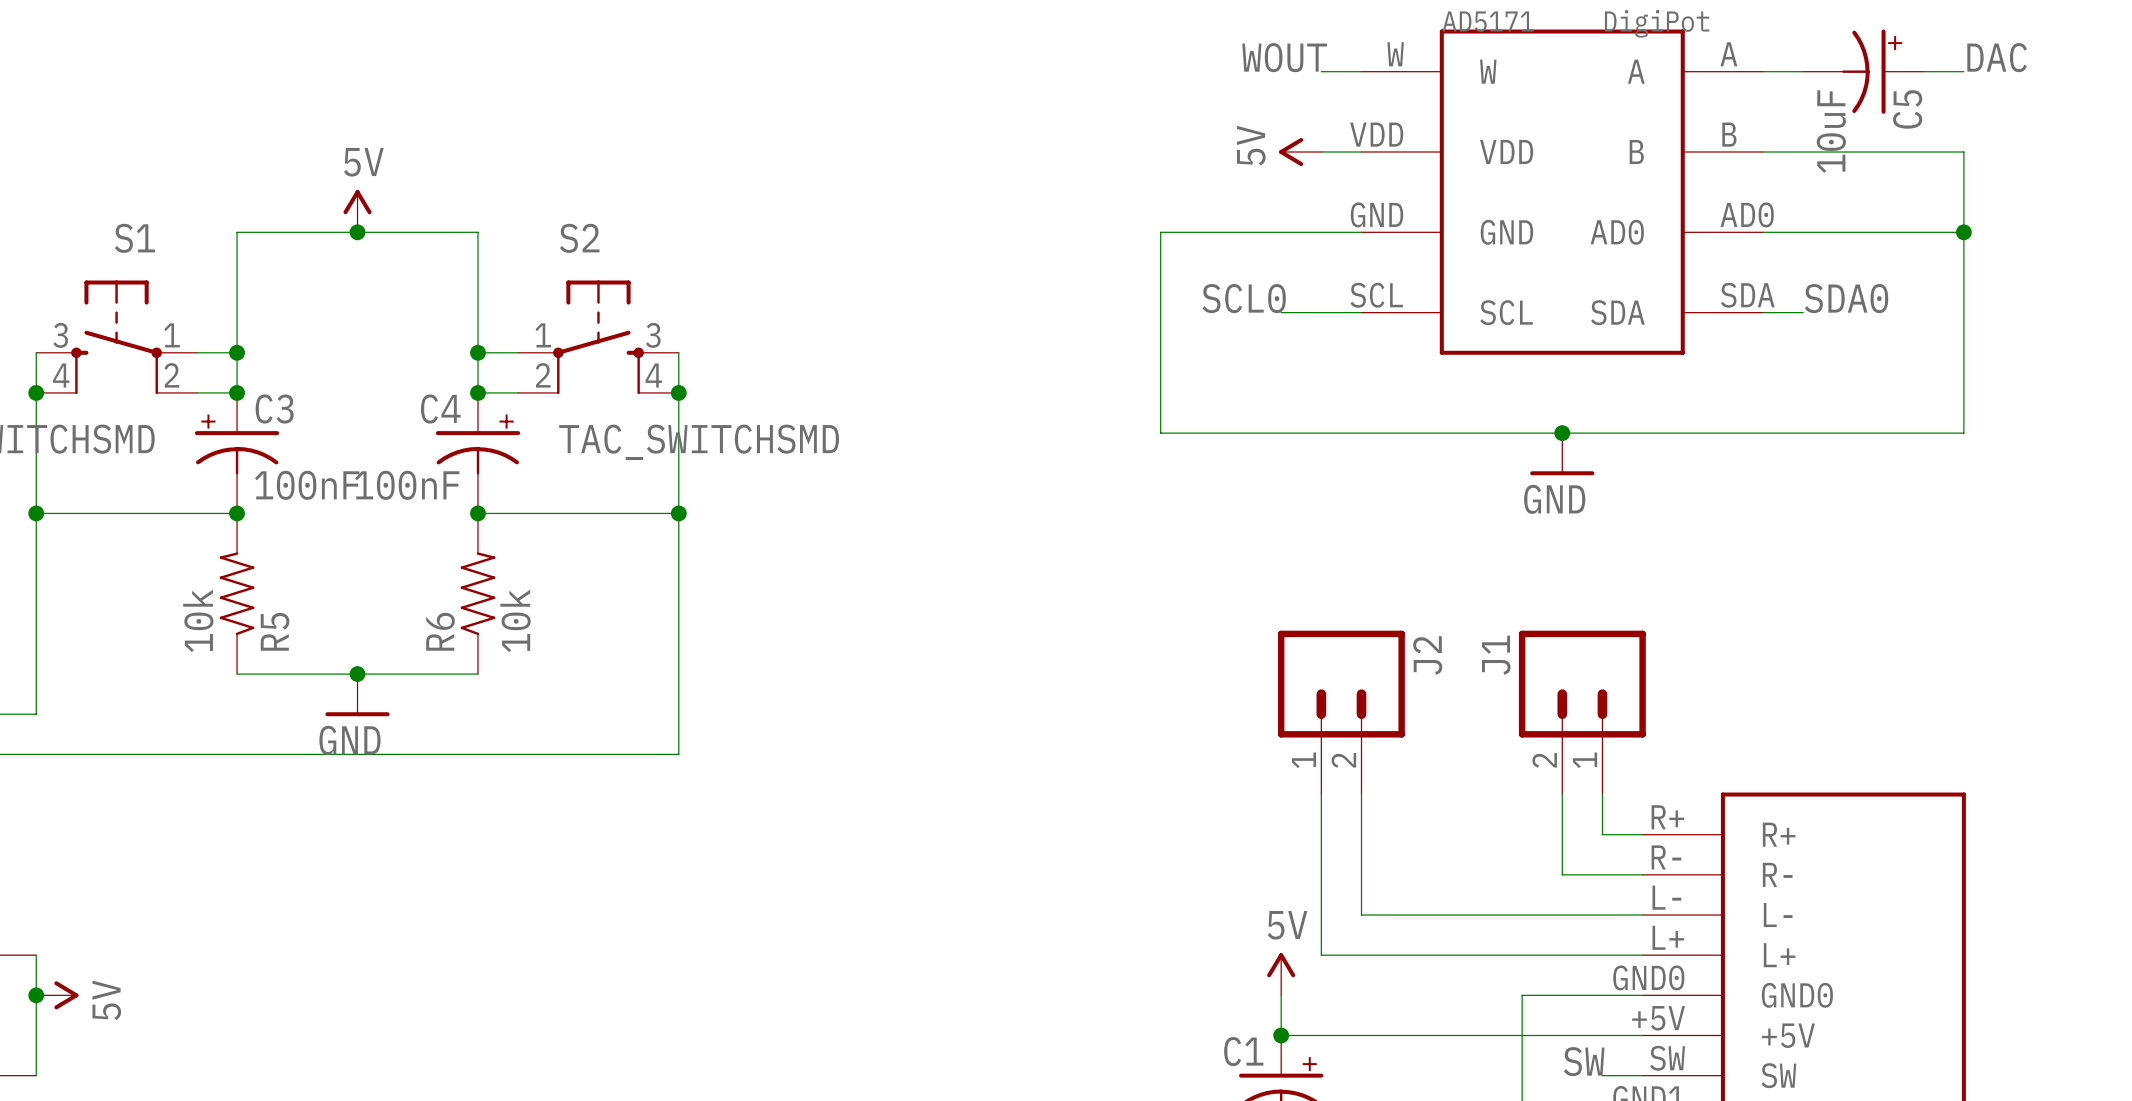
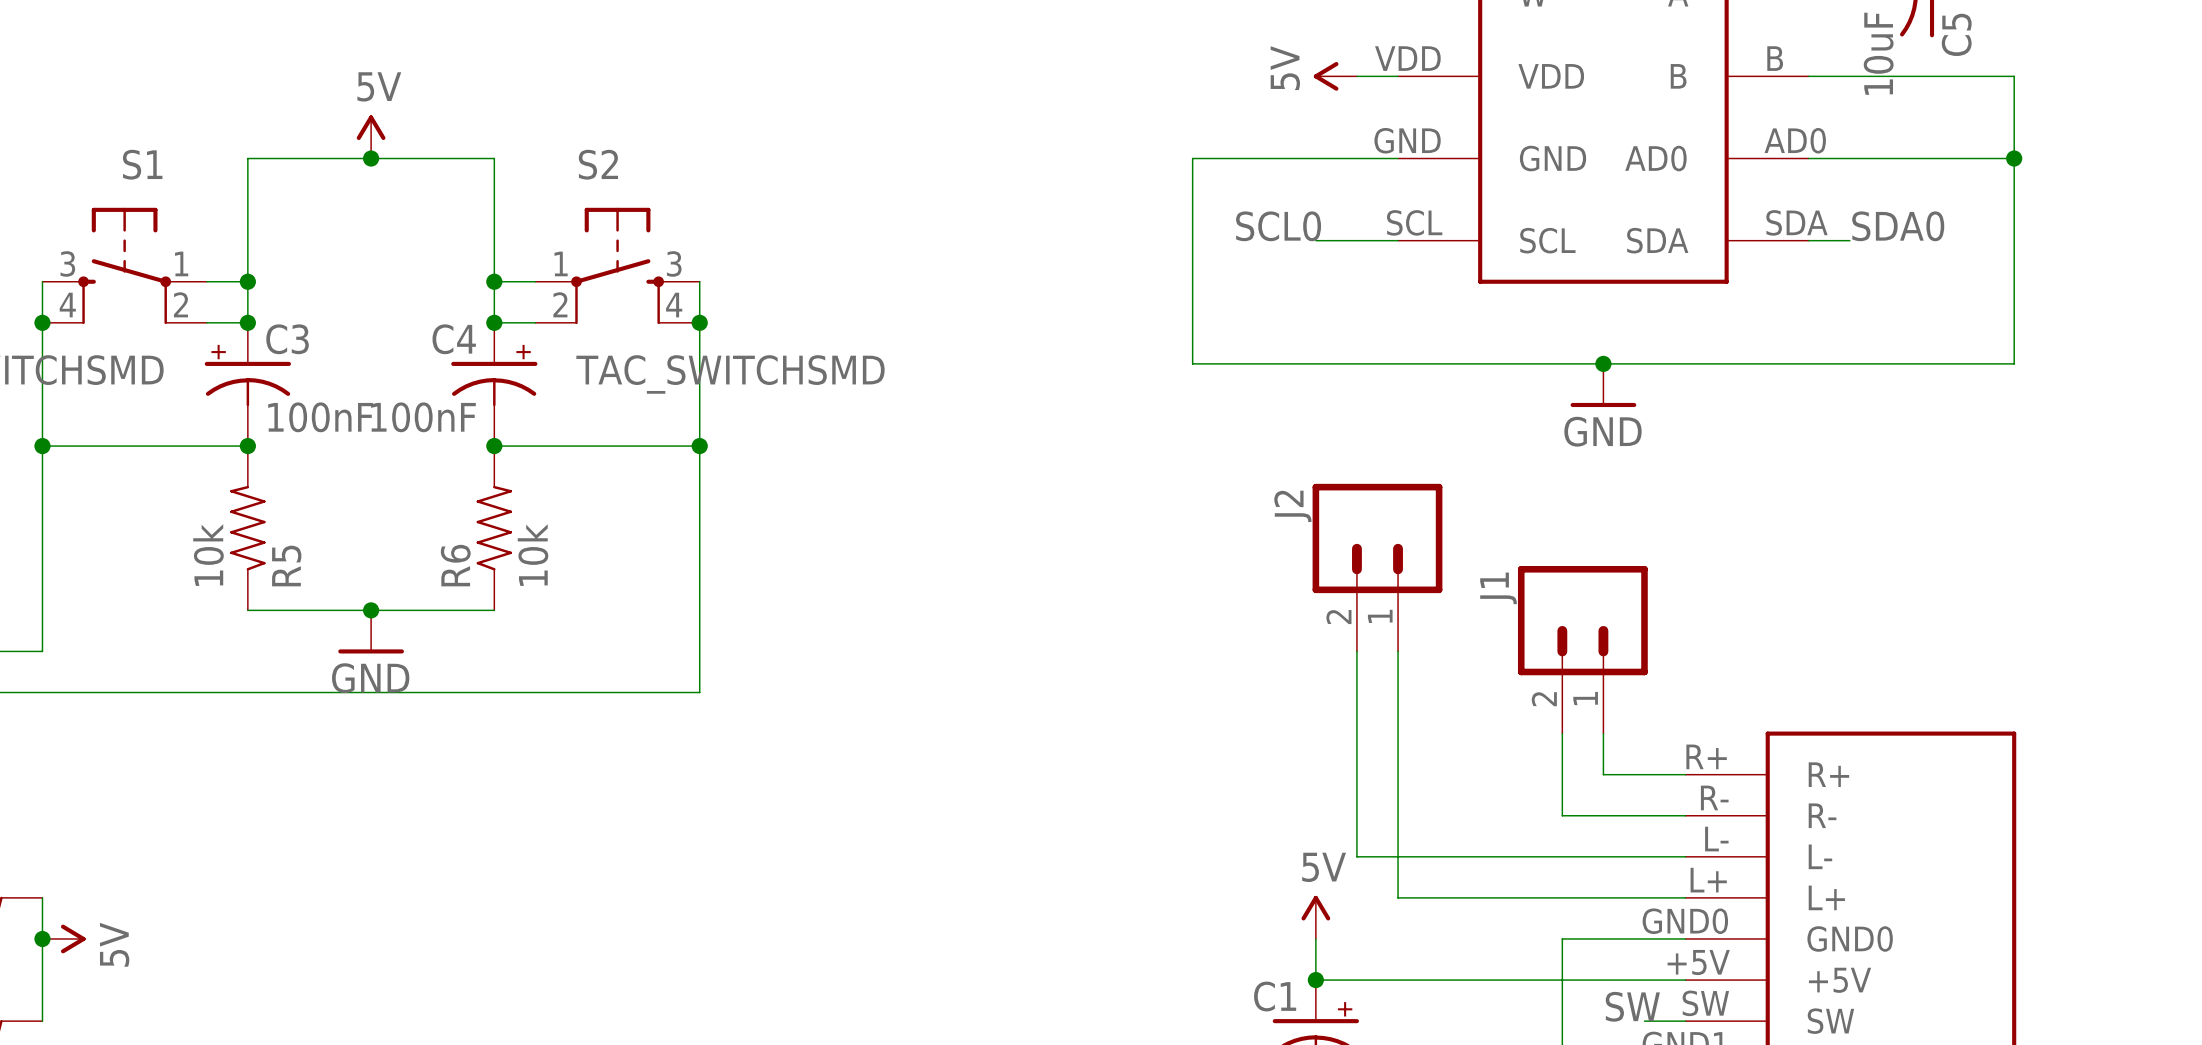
J2 flip: as is (1341, 684) -> left-right (1377, 538)
J1 position: (1582, 712) -> (1582, 649)
wire: (1602, 794) (1602, 834) -> (1603, 774) (1644, 774)
wire: (1562, 834) (1562, 874) -> (1562, 733) (1562, 815) (1603, 815)
wire: (1321, 915) (1321, 955) (1361, 955) -> (1356, 856) (1398, 856) (1398, 897)

